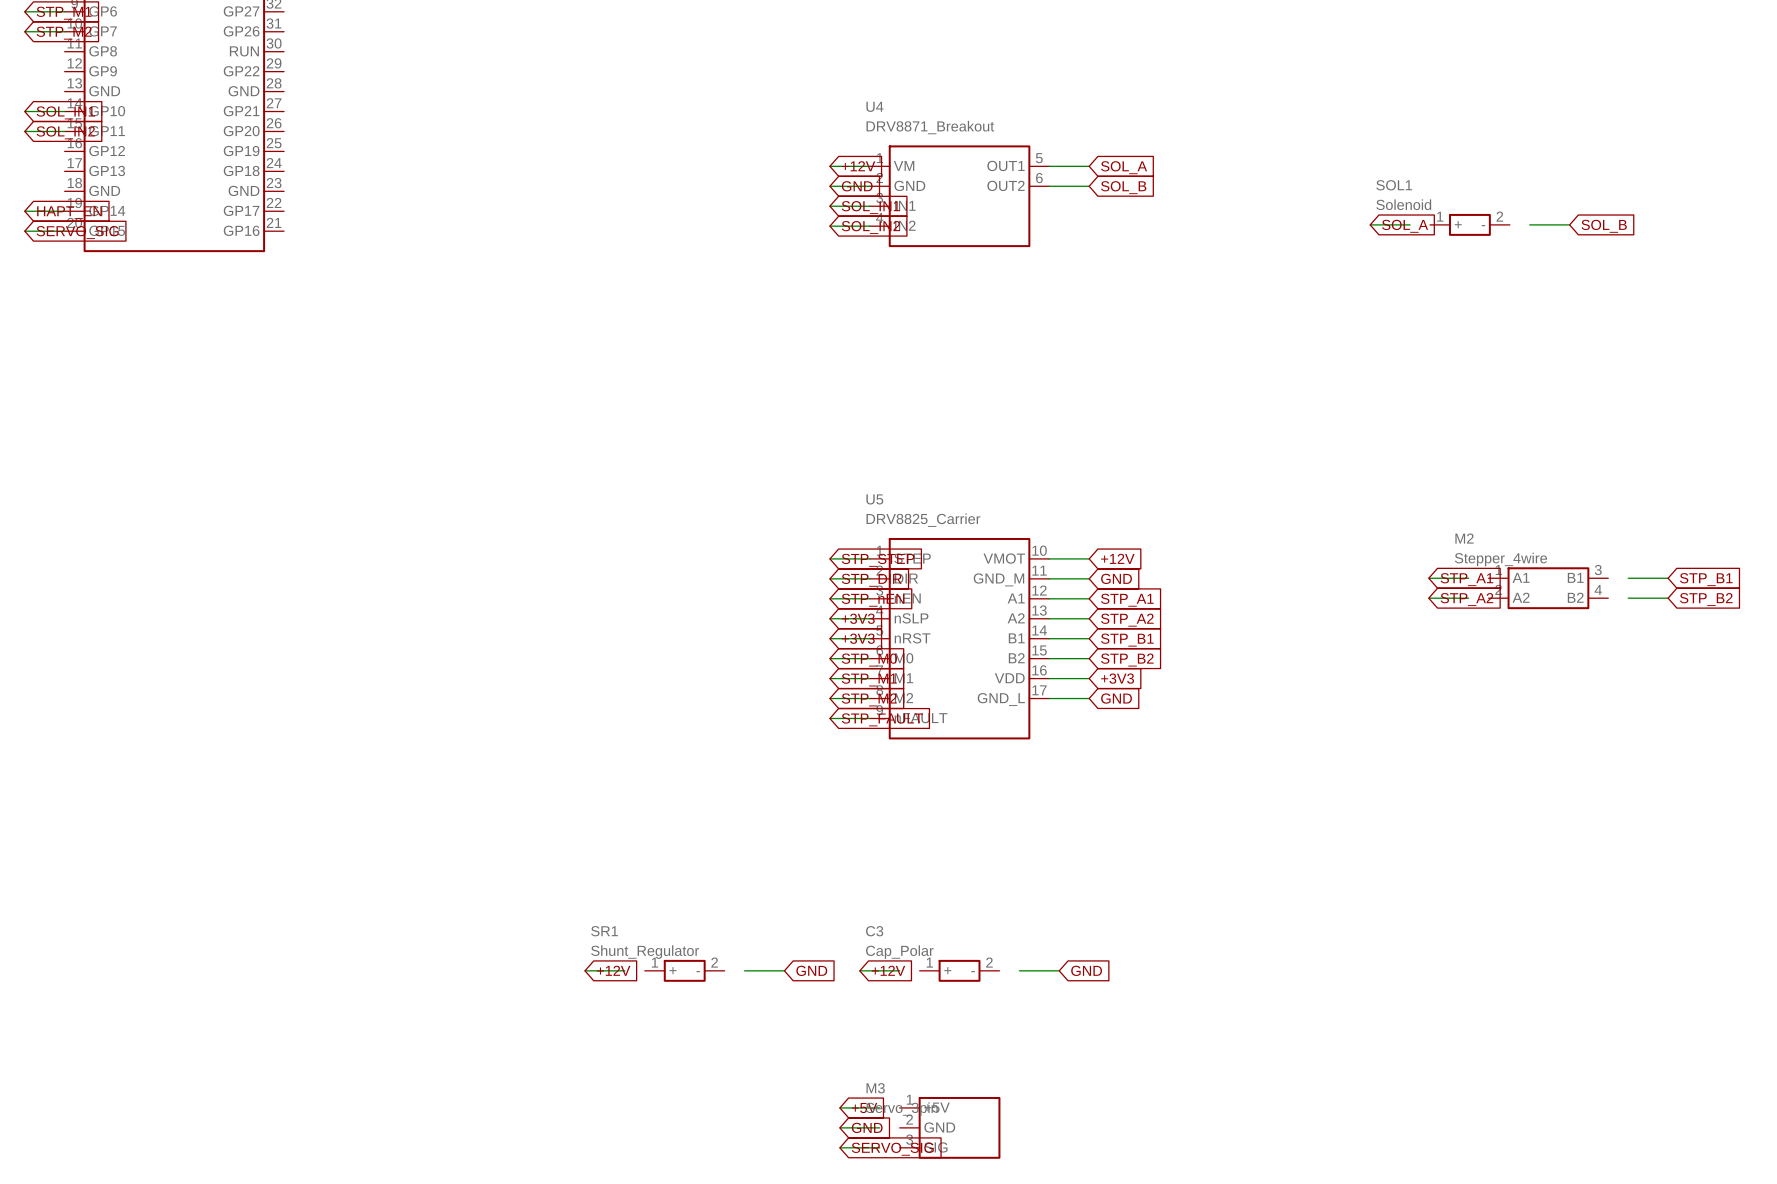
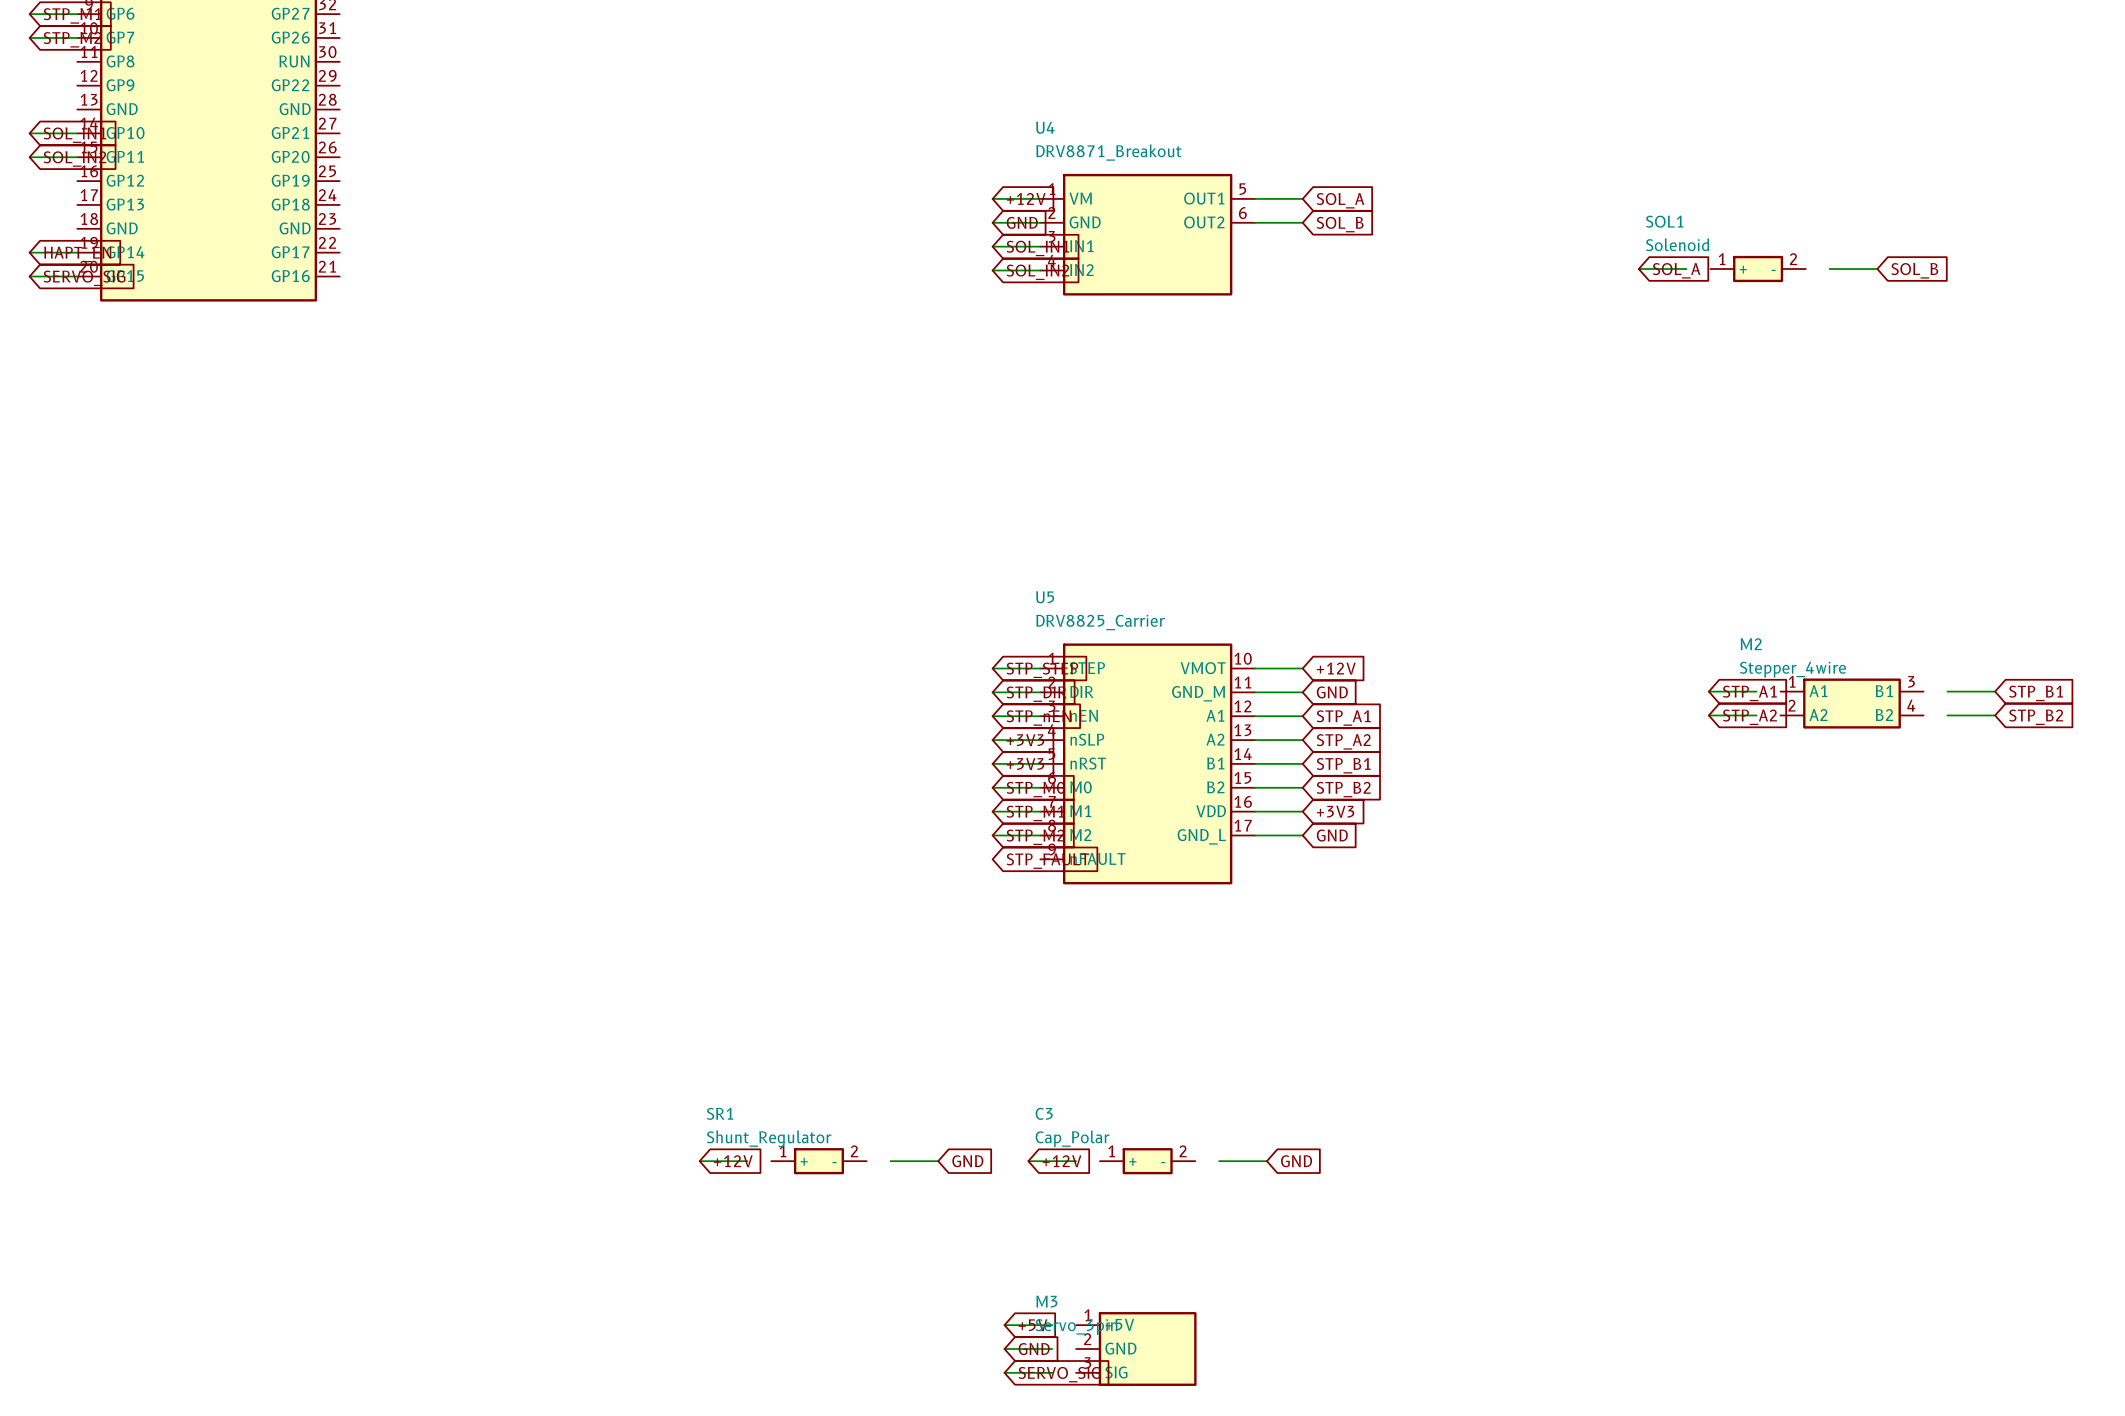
wire: (829, 718) (869, 718) -> none

